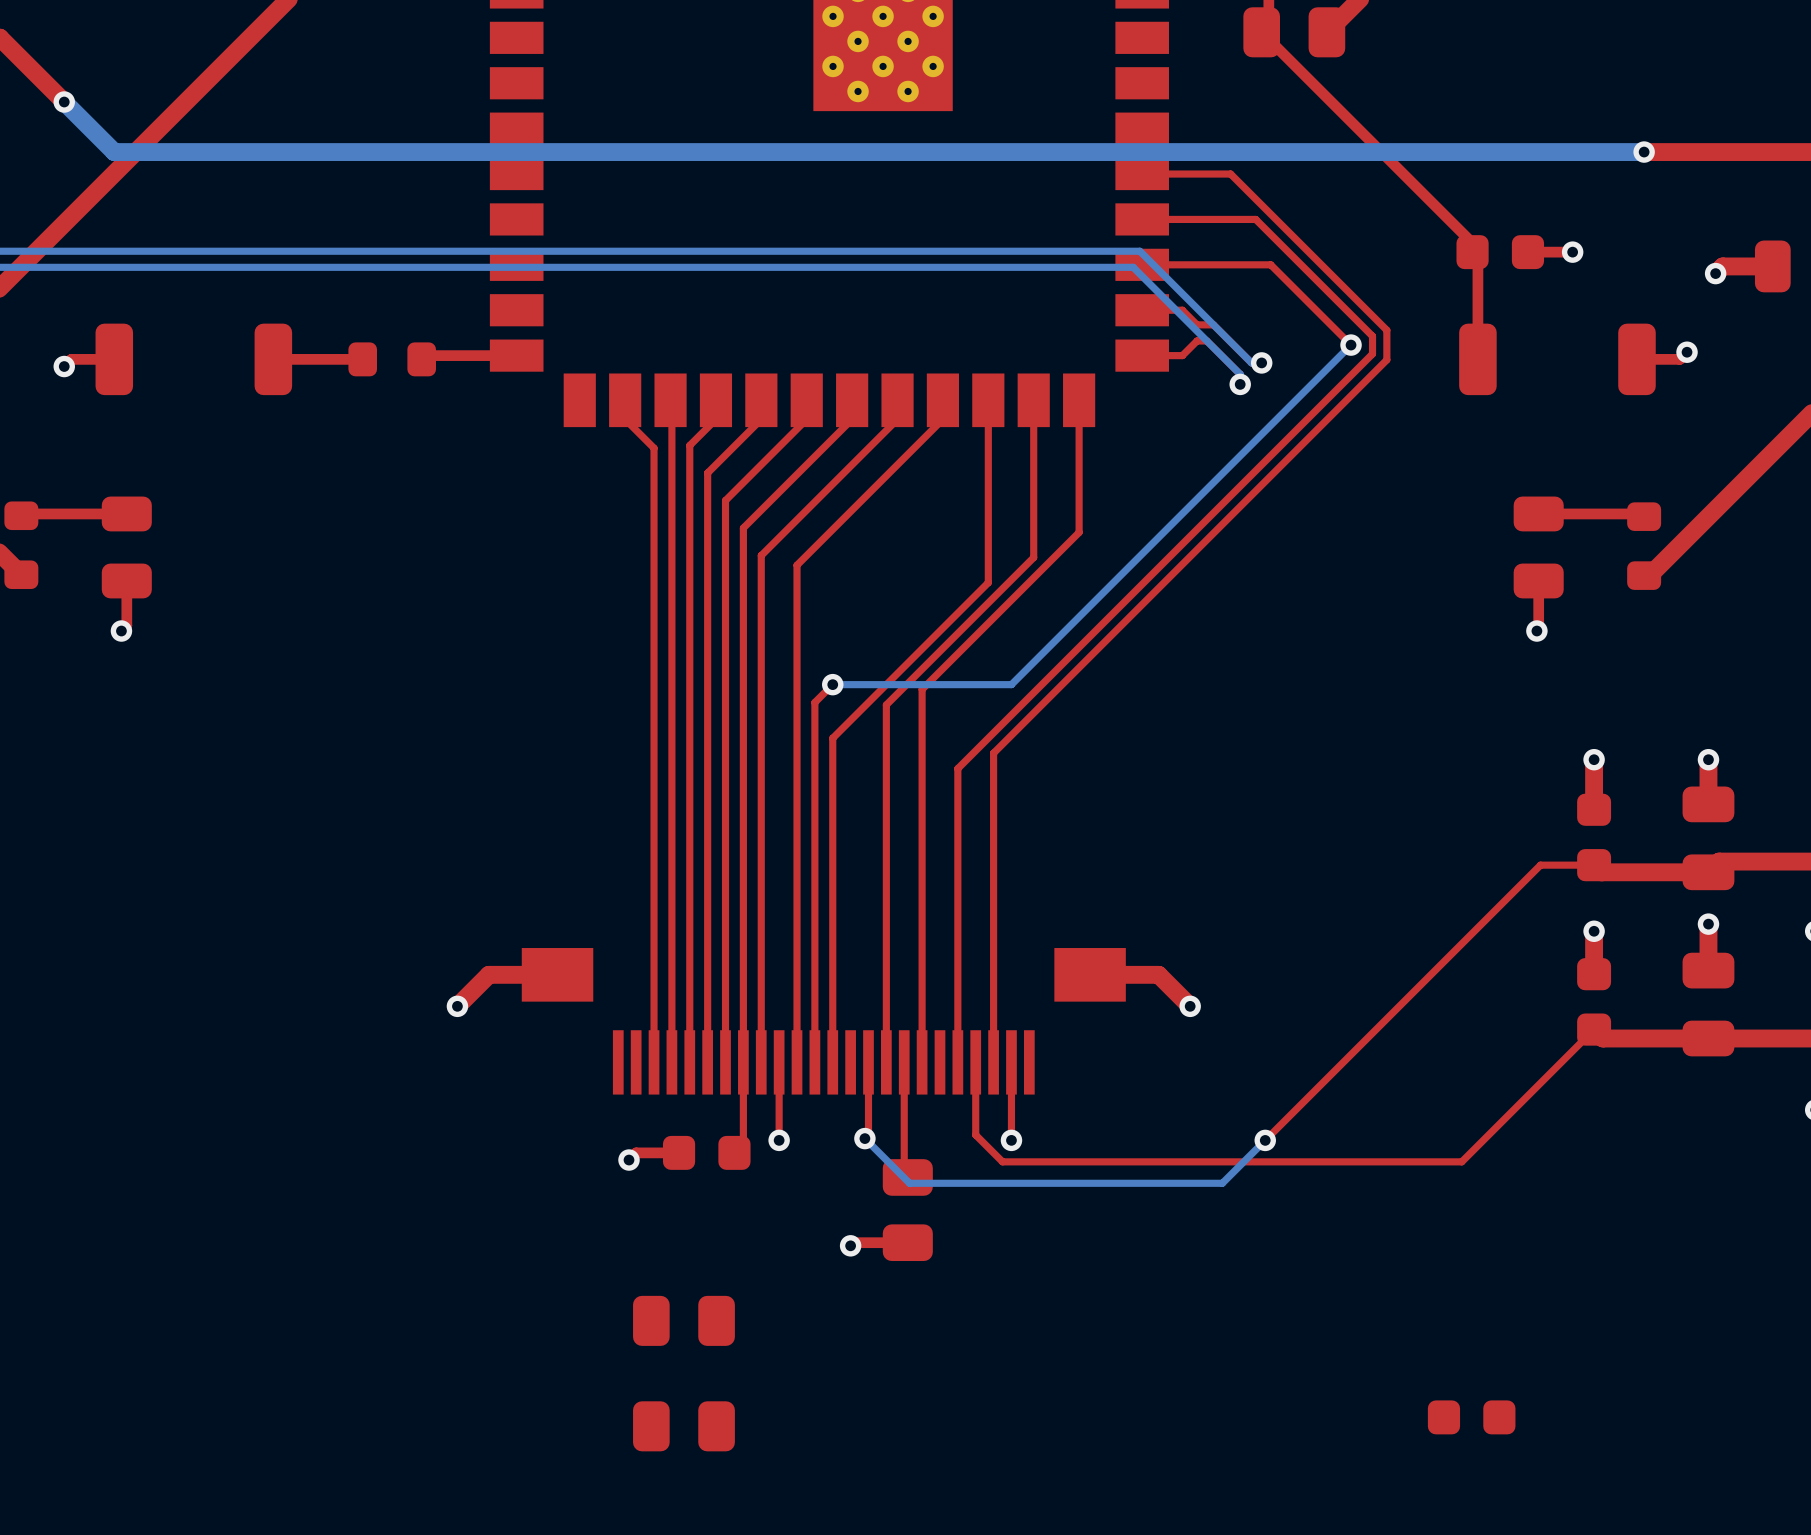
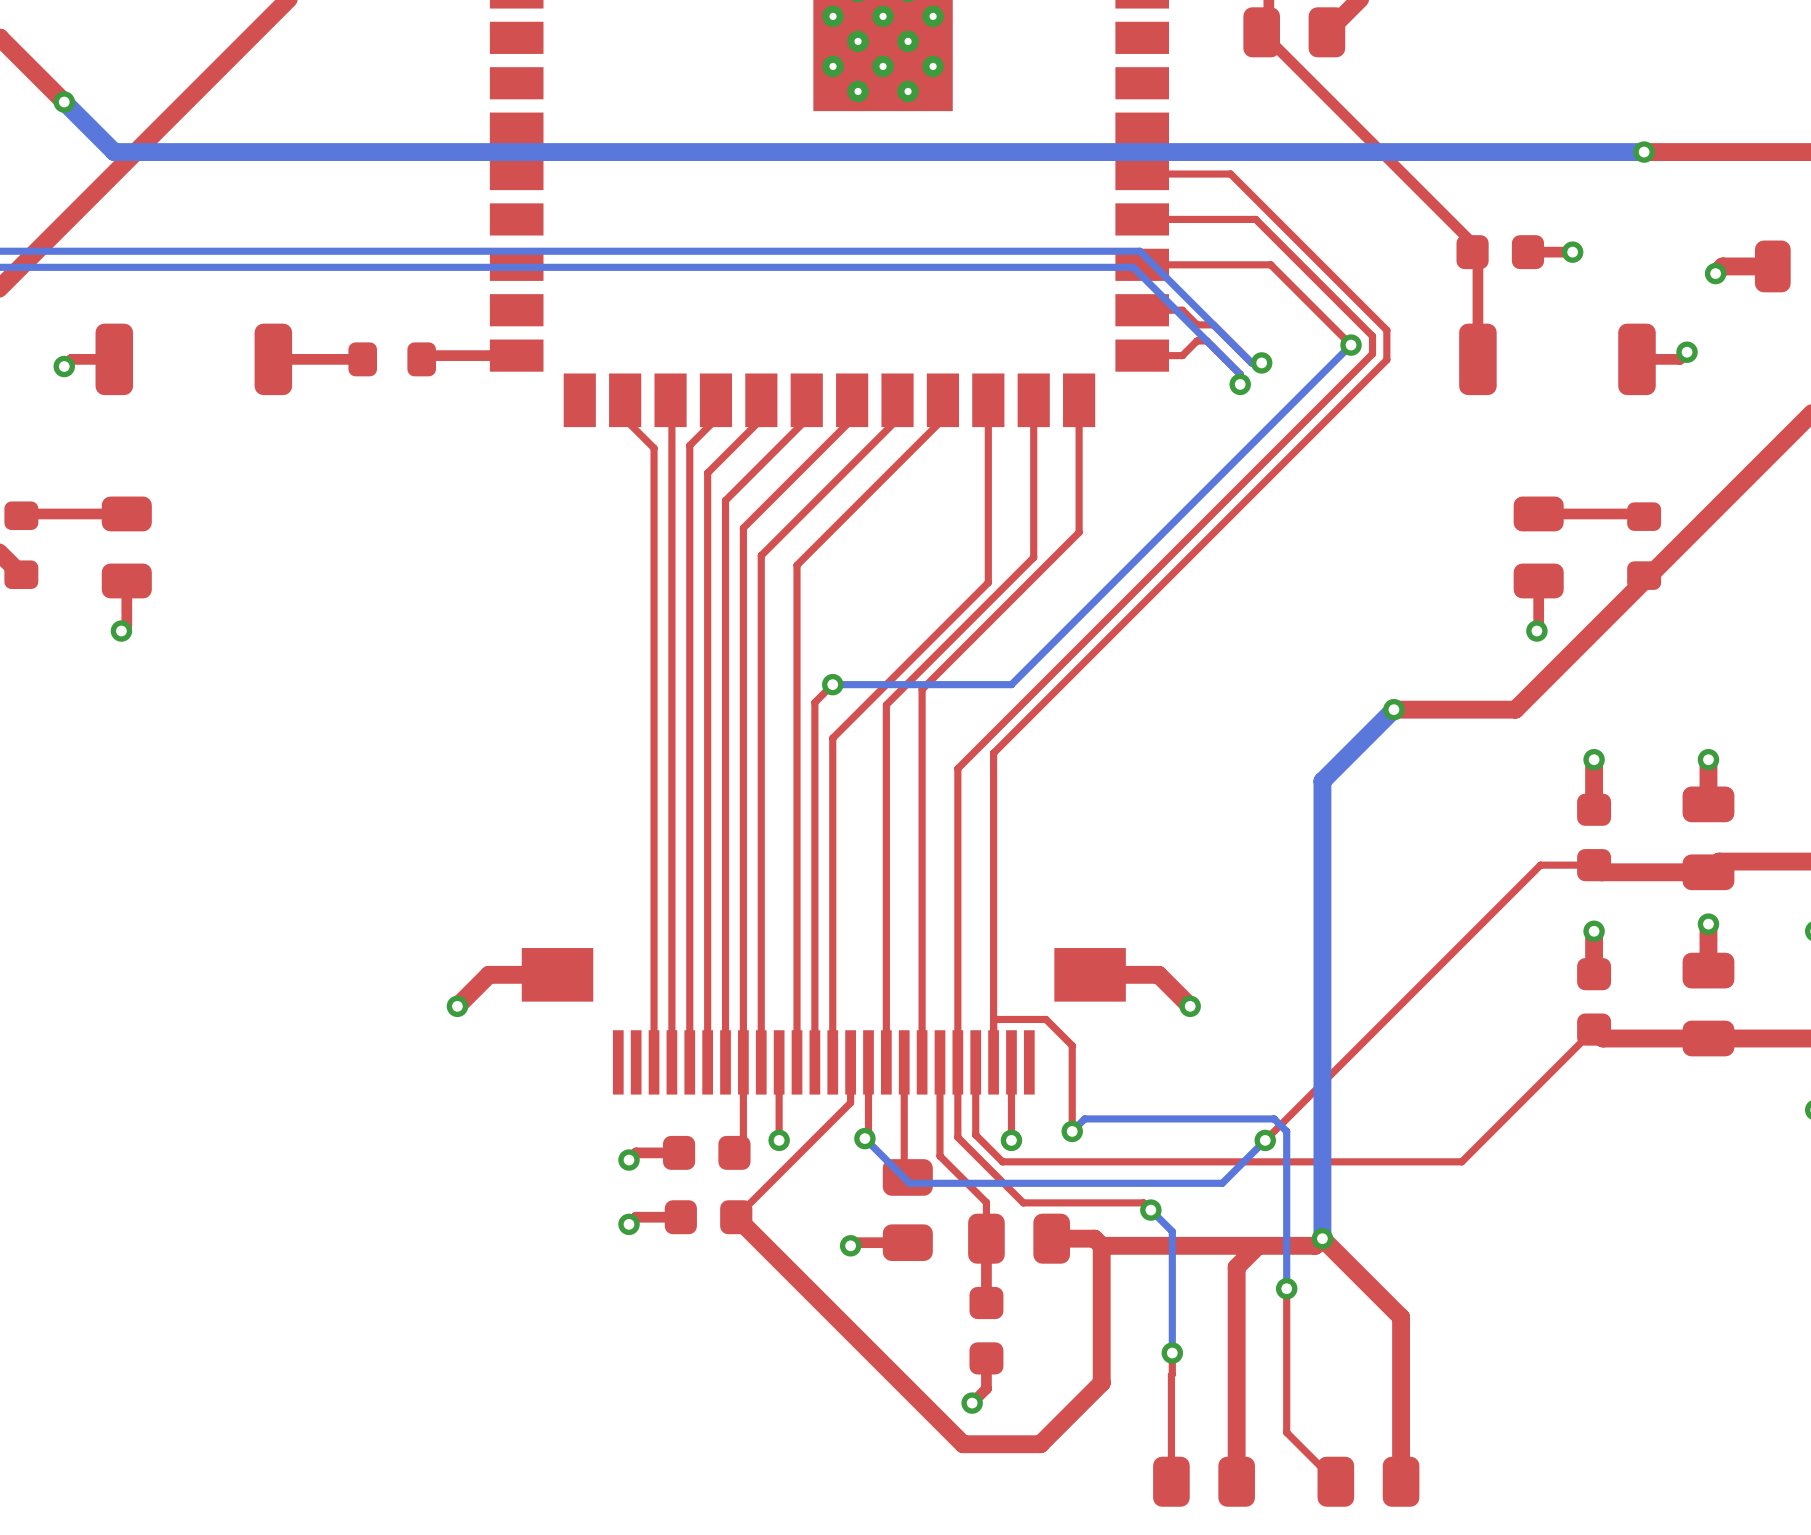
top track: none -> (1644, 575) (1644, 580) (1515, 709) (1393, 709)
bottom track: none -> (1393, 709) (1322, 781) (1322, 1238)
via: none -> (1393, 709)
top track: none -> (993, 1021) (995, 1019) (1046, 1019) (1072, 1045) (1072, 1131)
top track: none -> (850, 1062) (850, 1102) (736, 1217) (963, 1444) (1040, 1444) (1101, 1382) (1101, 1245)
top track: none -> (939, 1062) (939, 1156) (986, 1202) (986, 1303)
top track: none -> (957, 1062) (957, 1137) (1023, 1202) (1143, 1202) (1150, 1210)
bottom track: none -> (1072, 1131) (1084, 1118) (1274, 1118) (1286, 1131) (1286, 1288)
via: none -> (1072, 1131)
bottom track: none -> (1150, 1210) (1172, 1231) (1172, 1353)
via: none -> (1150, 1210)
top track: none -> (680, 1217) (636, 1217) (629, 1224)
part: none -> (708, 1217)
via: none -> (629, 1224)
part: none -> (1019, 1238)
top track: none -> (1051, 1238) (1094, 1238) (1101, 1245)
via: none -> (1322, 1238)
top track: none -> (1101, 1245) (1315, 1245) (1322, 1238) (1401, 1317) (1401, 1481)
top track: none -> (1258, 1245) (1236, 1267) (1236, 1481)
top track: none -> (1286, 1288) (1286, 1432) (1335, 1481)
via: none -> (1286, 1288)
part: (683, 1320) -> none
part: none -> (986, 1330)
top track: none -> (1172, 1353) (1171, 1481)
via: none -> (1172, 1353)
top track: none -> (986, 1358) (986, 1388) (972, 1403)
via: none -> (972, 1403)
part: (1471, 1417) -> none
part: (683, 1426) -> none
part: none -> (1204, 1481)
part: none -> (1368, 1481)

